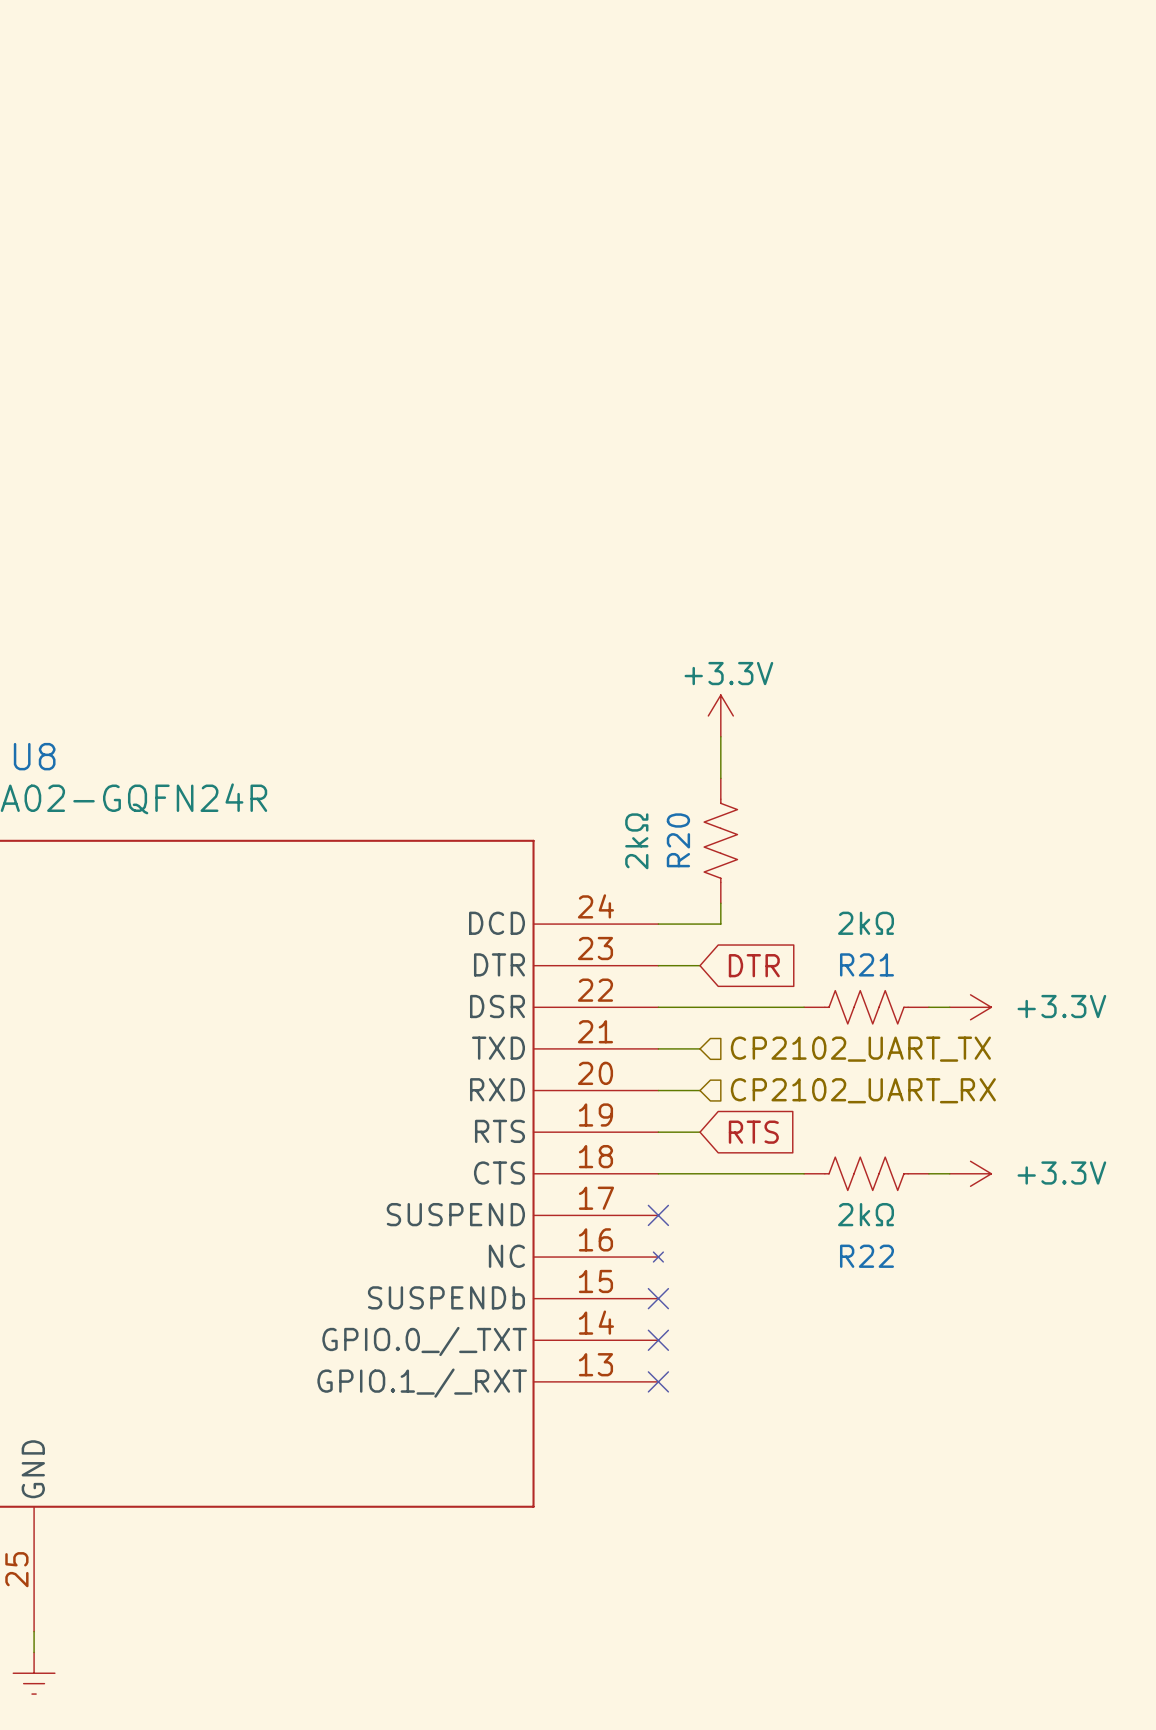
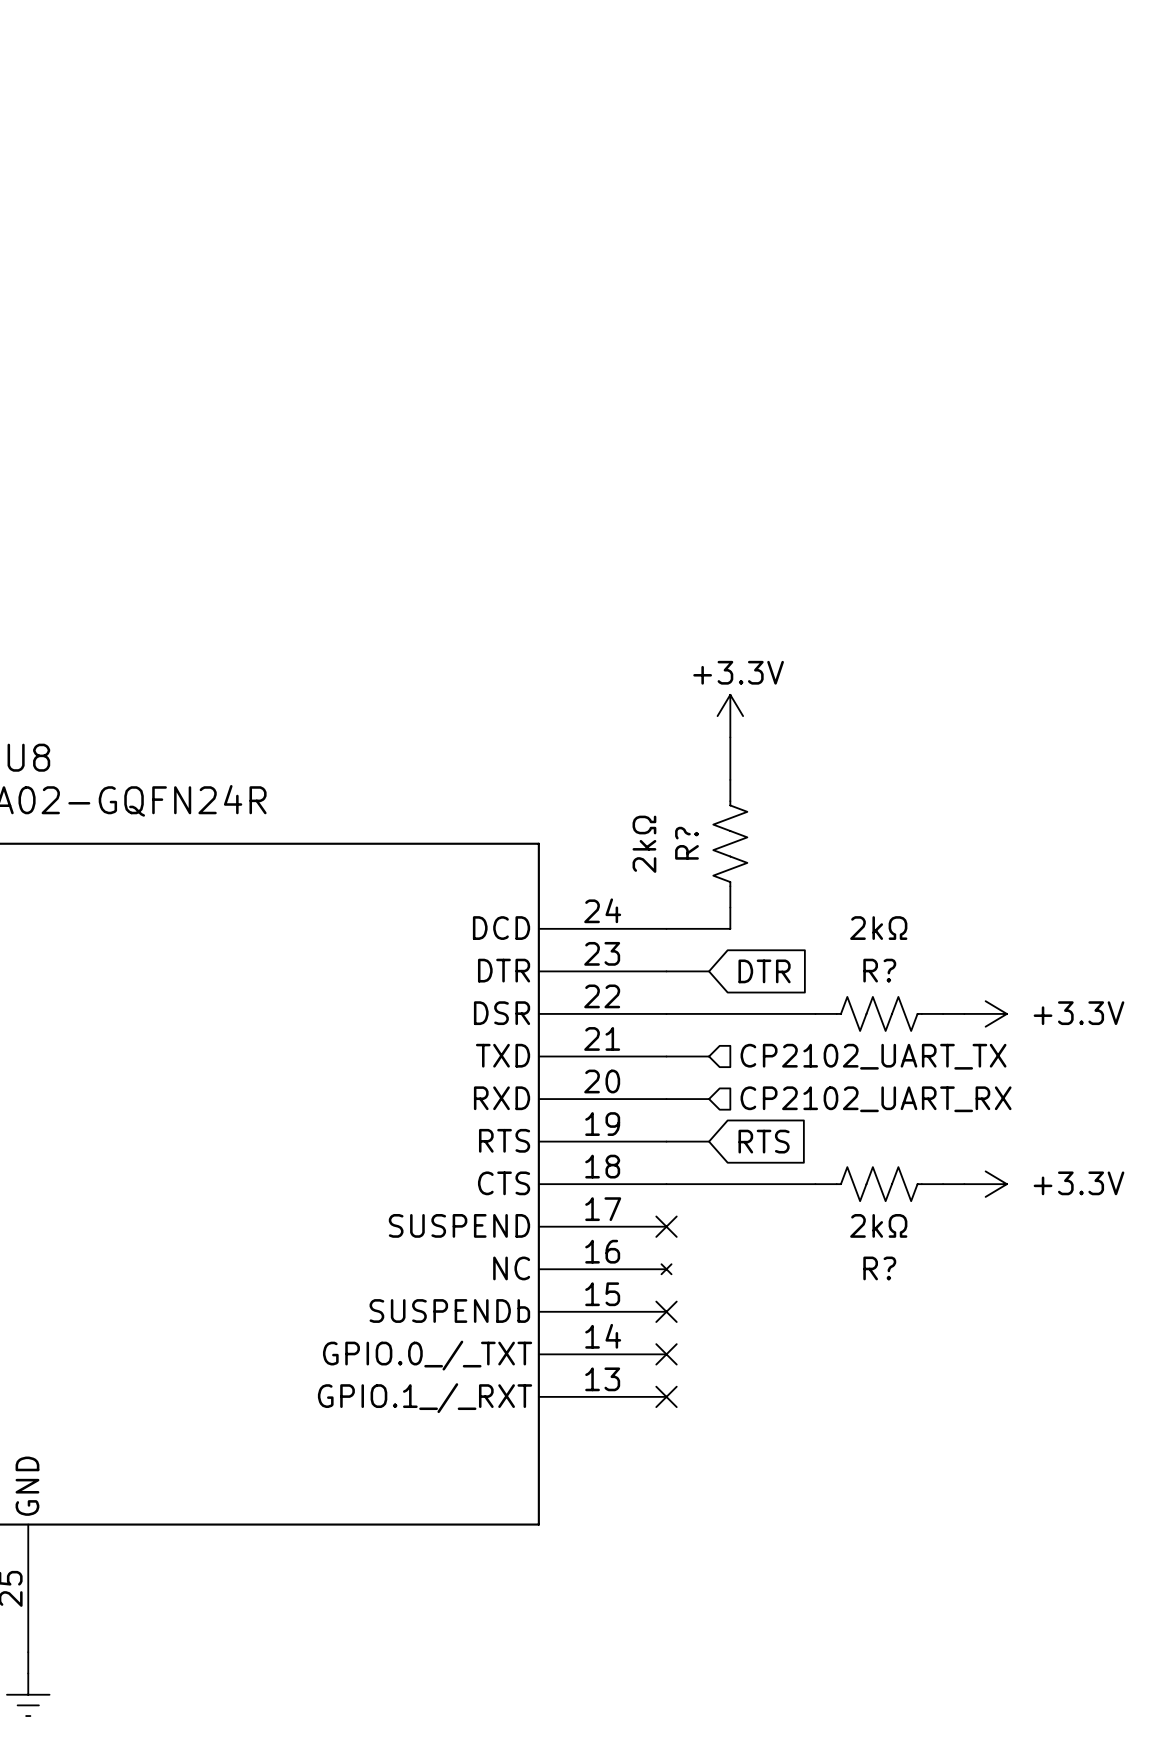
R20 name: R20 (678, 840) -> R? (686, 843)
R21 name: R21 (866, 964) -> R? (879, 970)
R22 name: R22 (866, 1256) -> R? (879, 1268)

